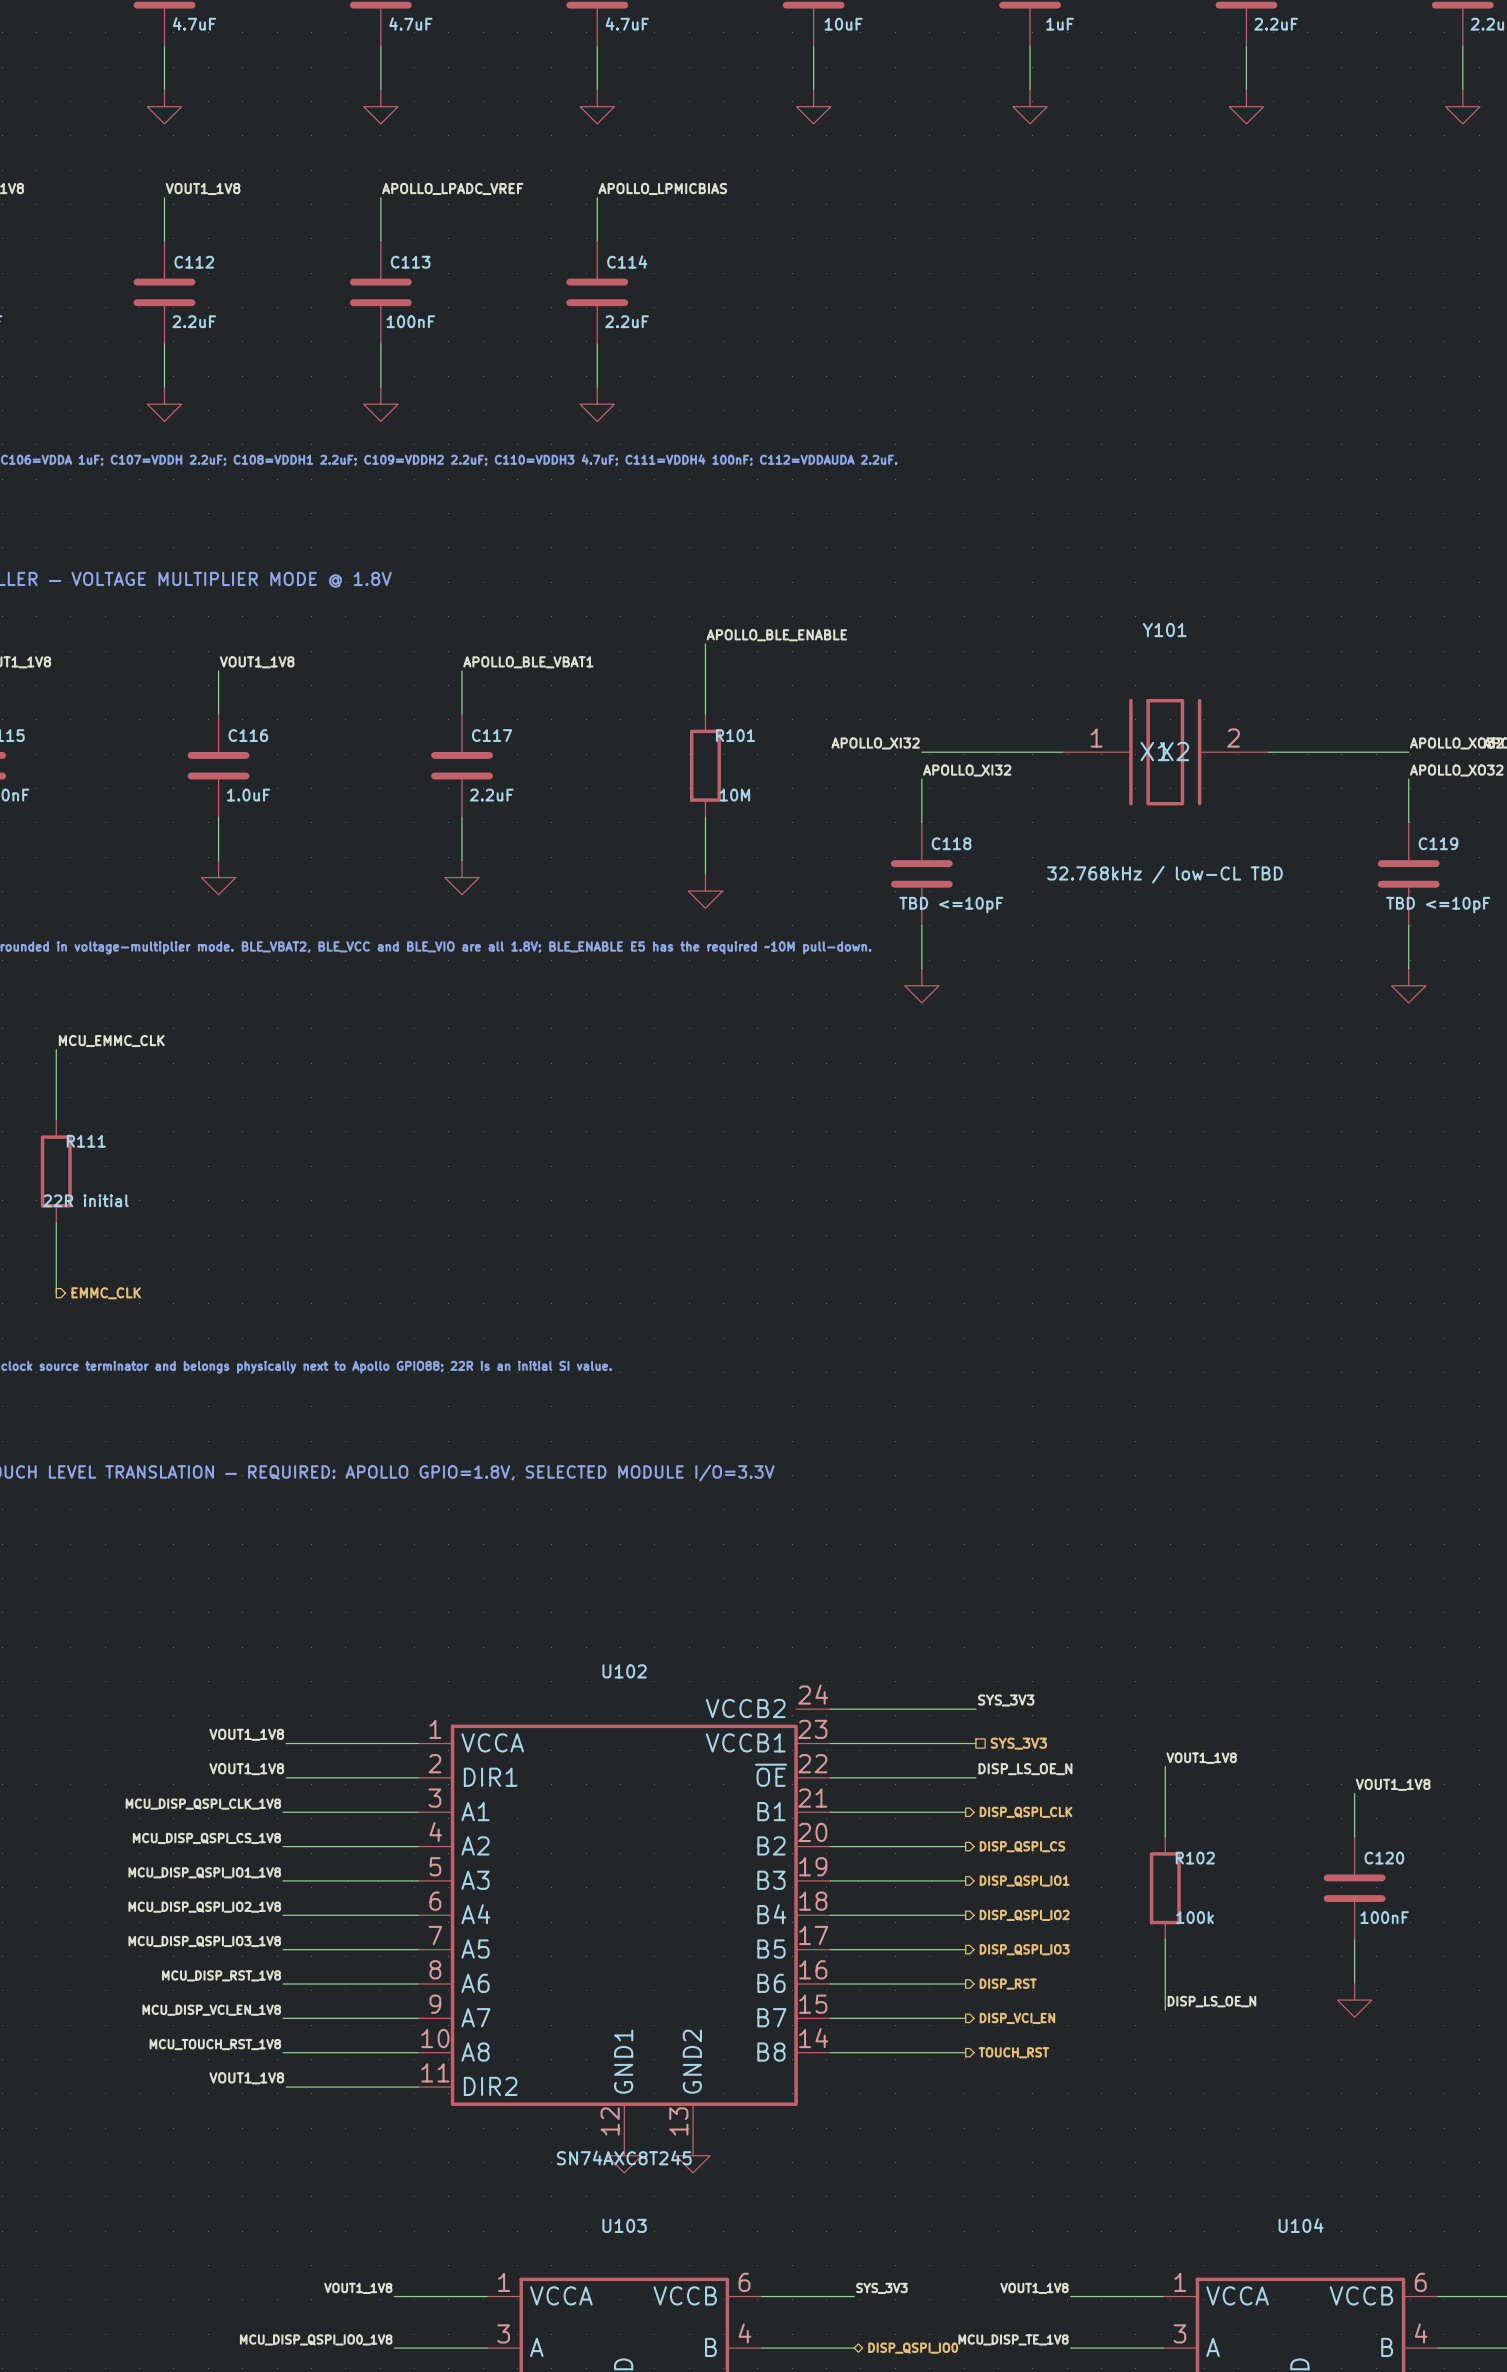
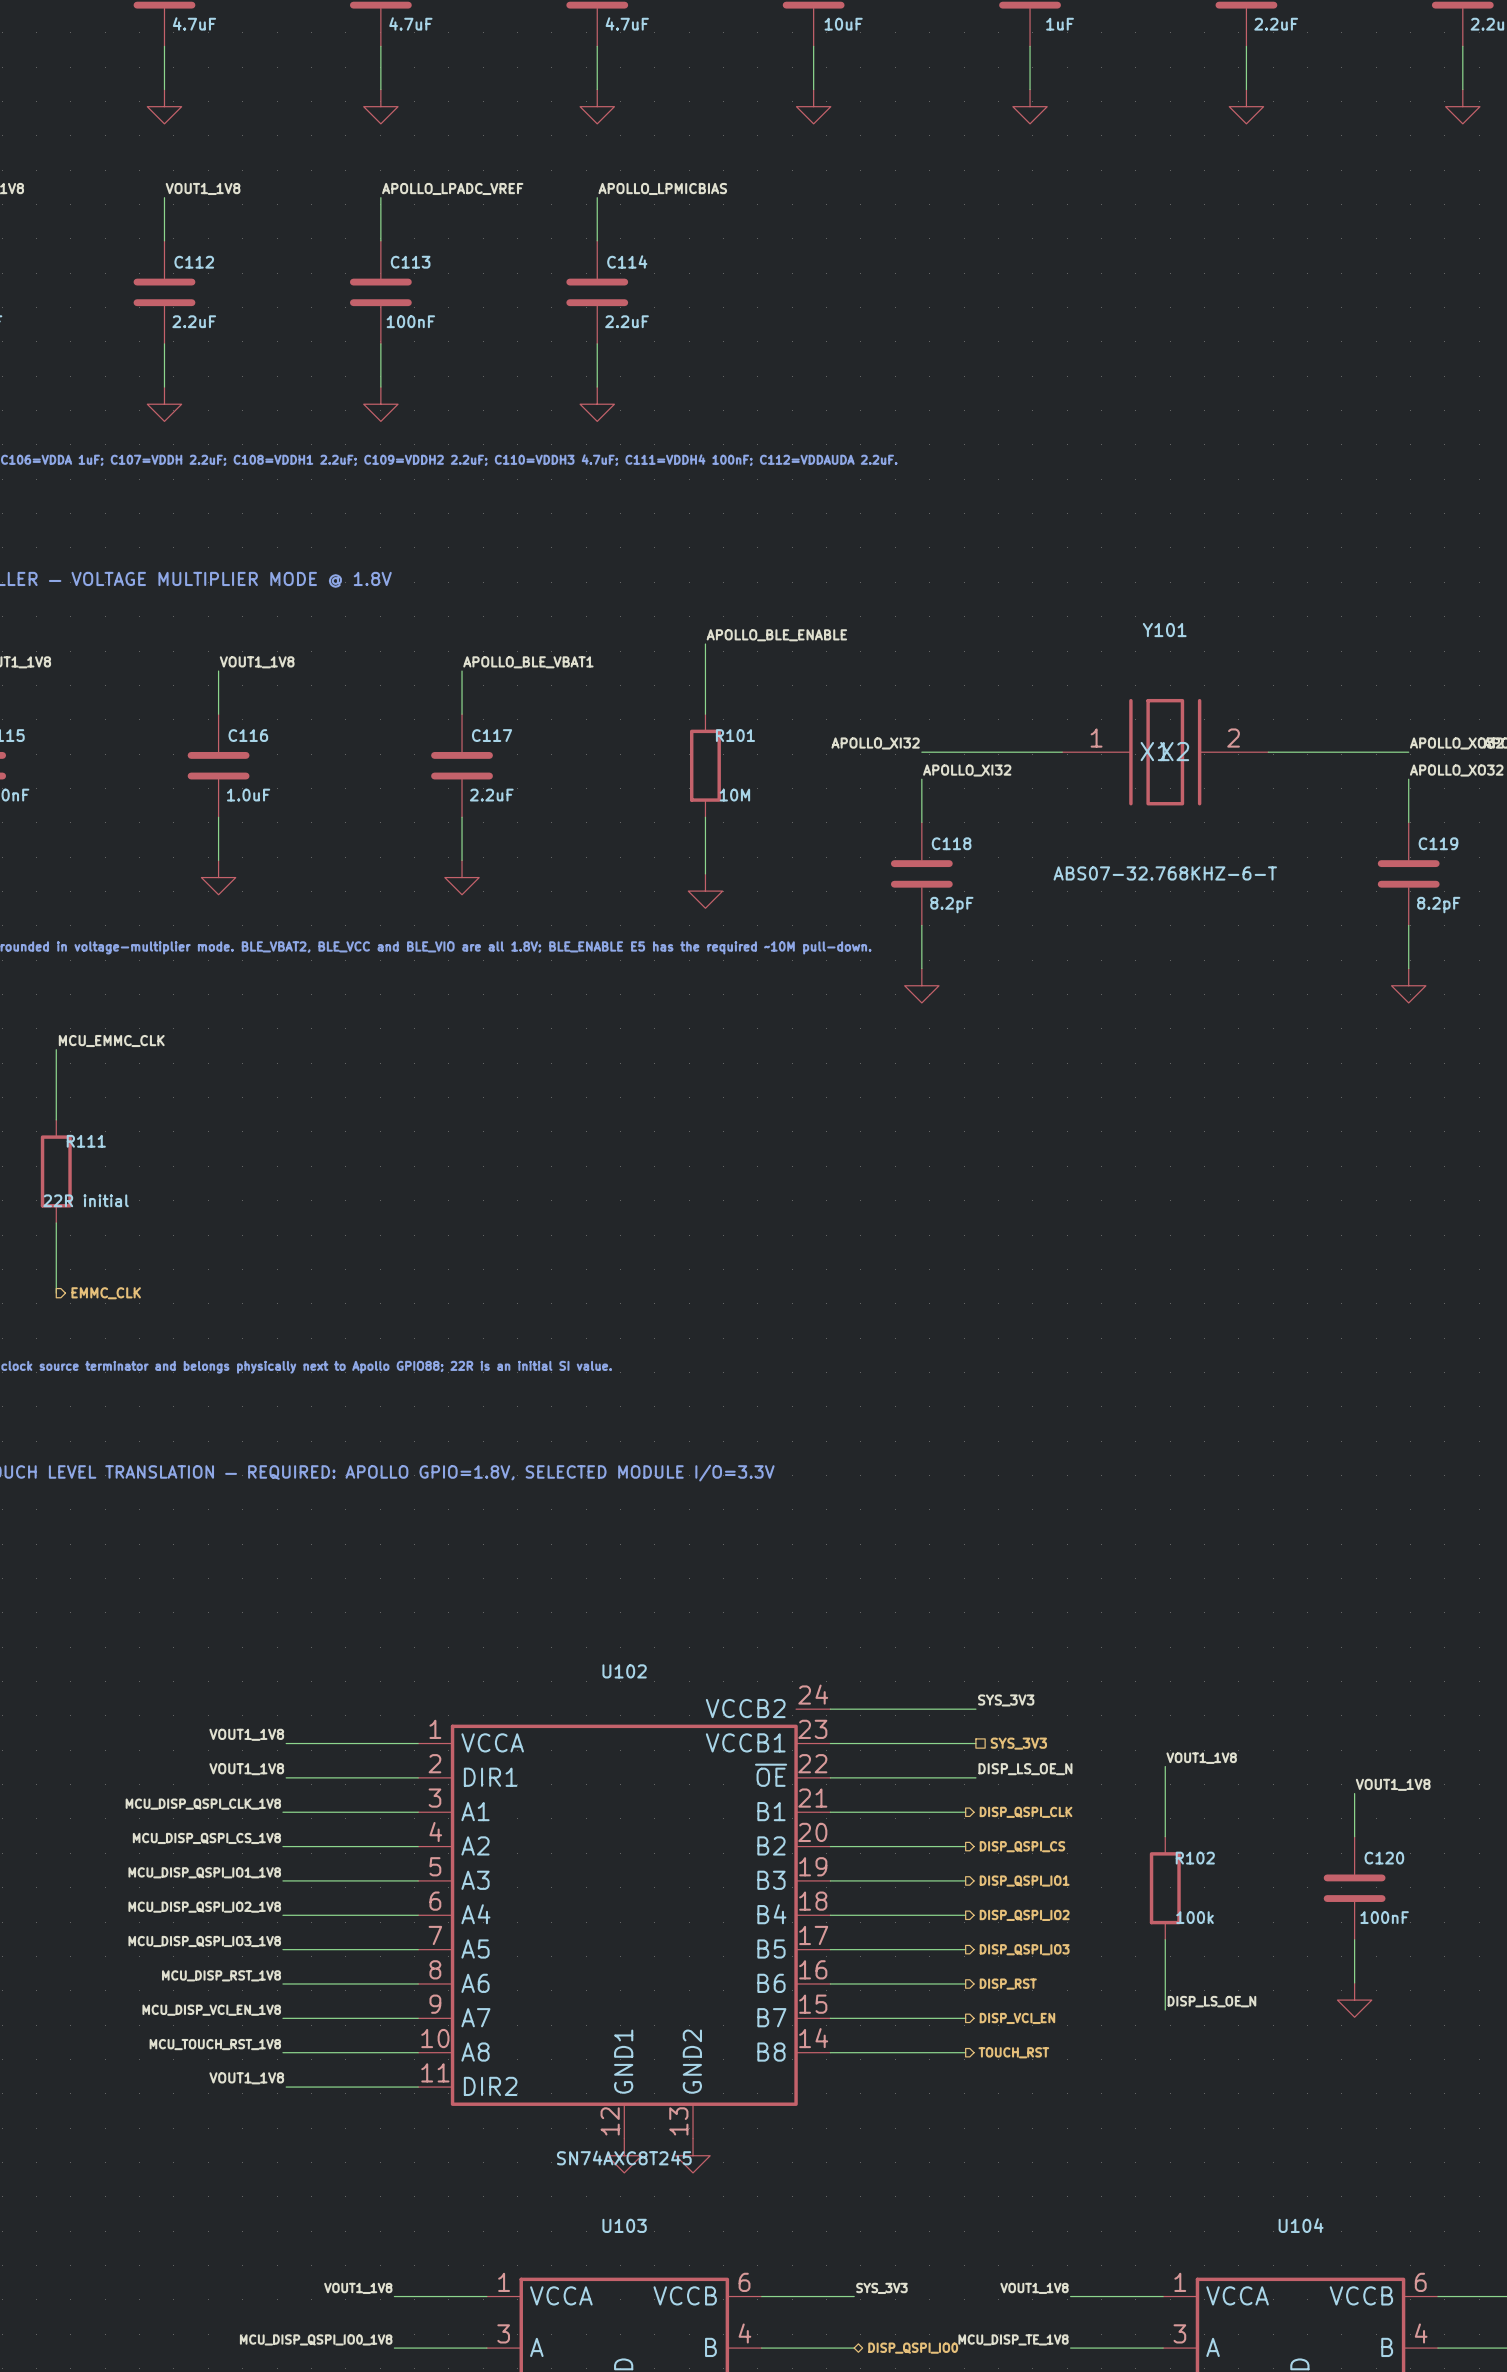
Y101 value: 32.768kHz / low-CL TBD (1164, 874) -> ABS07-32.768KHZ-6-T (1165, 873)
C118 value: TBD <=10pF (951, 905) -> 8.2pF (951, 905)
C119 value: TBD <=10pF (1438, 905) -> 8.2pF (1438, 905)

